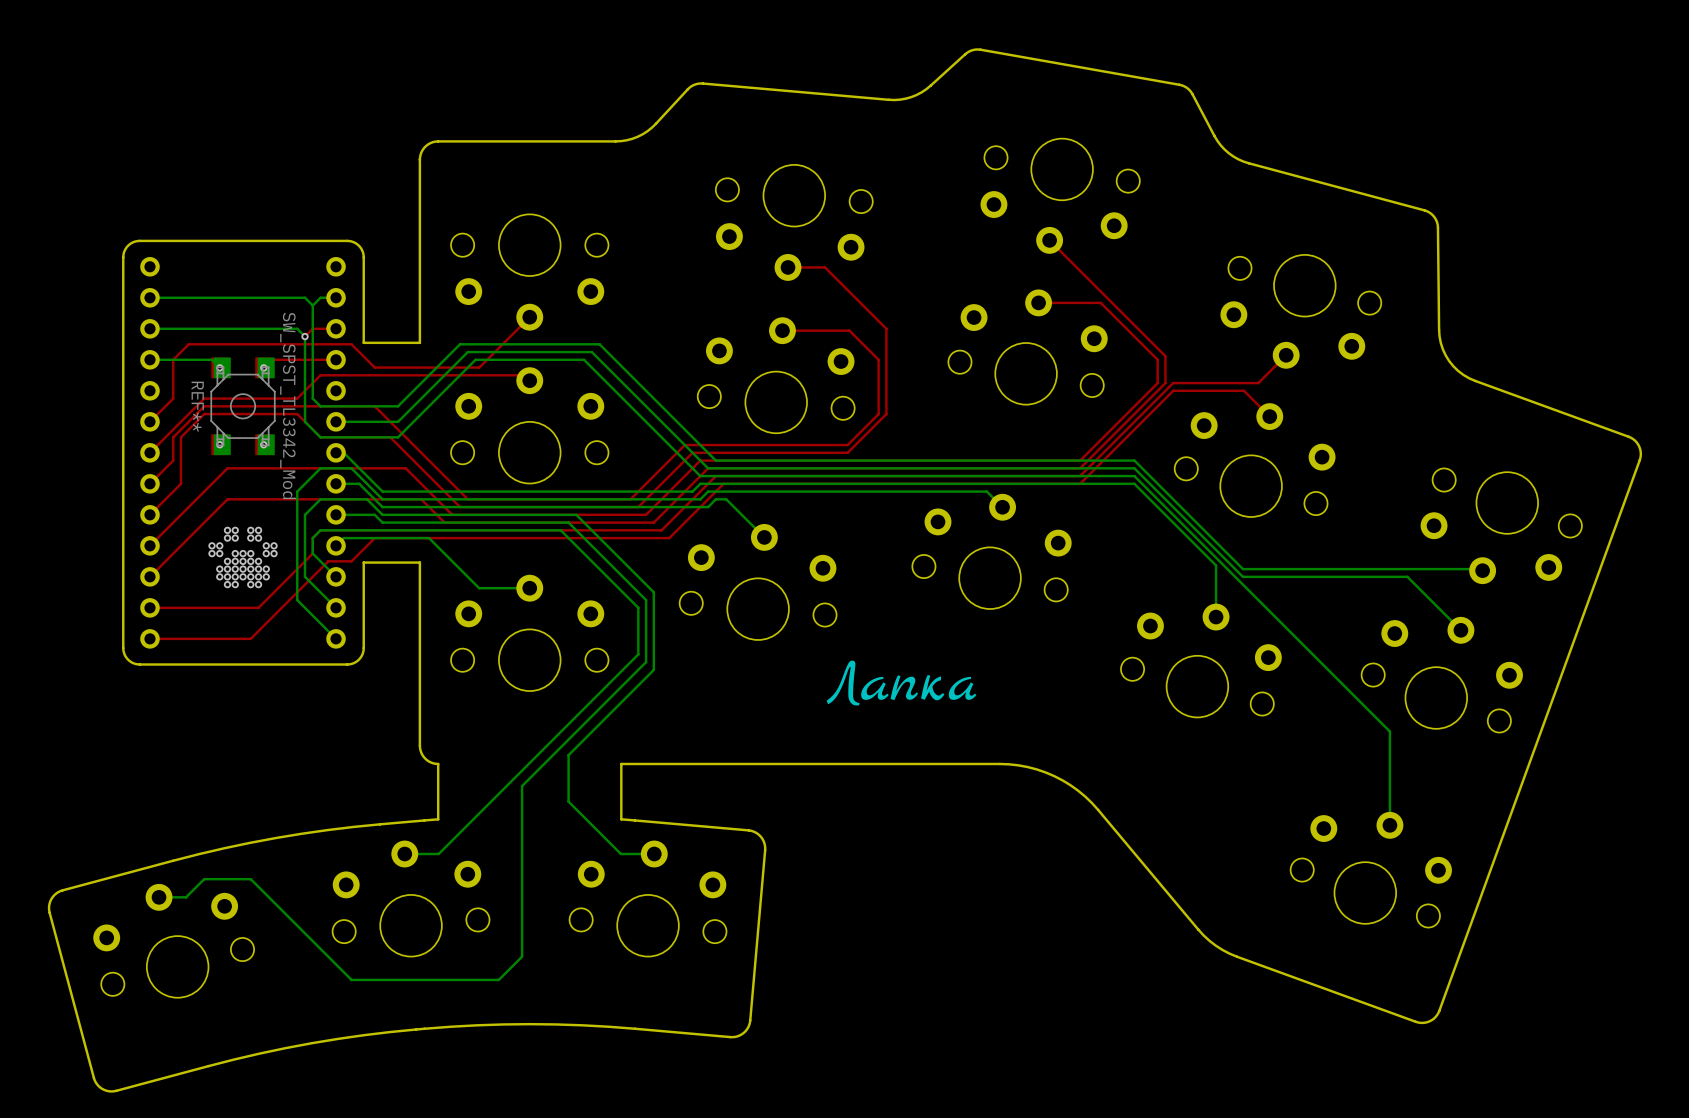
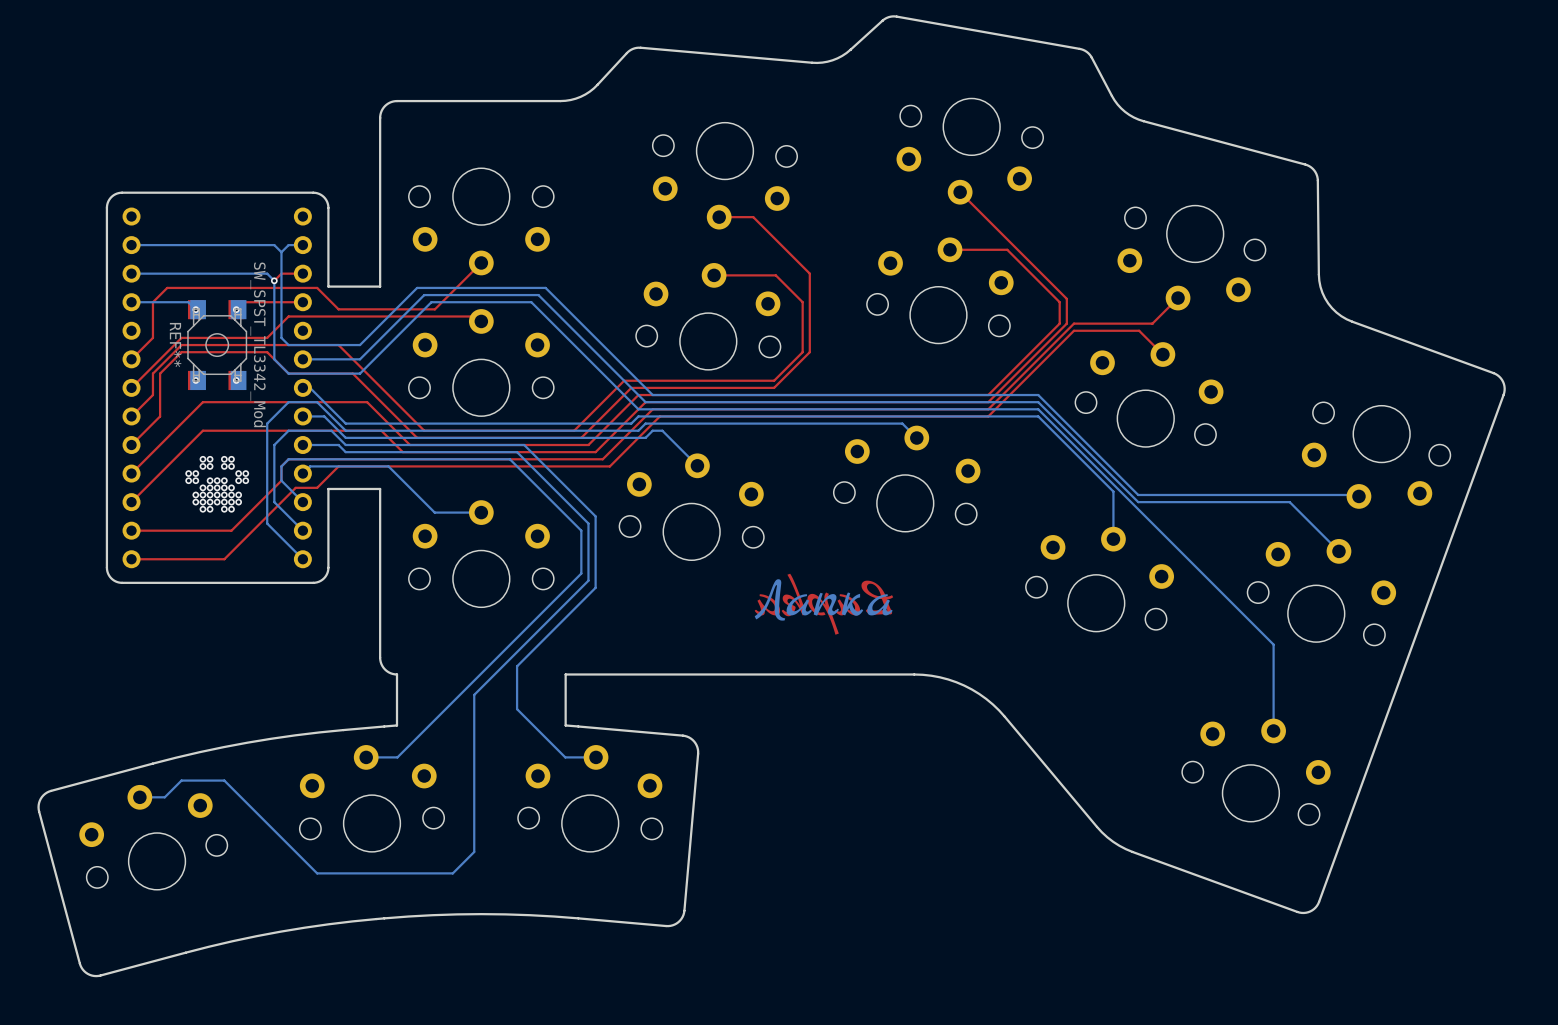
drawing: none -> [754, 573, 894, 635]
drawing shape: [826, 660, 860, 706] -> [754, 579, 786, 621]
drawing shape: [921, 674, 945, 701] -> [841, 592, 864, 616]
drawing shape: [890, 675, 919, 701] -> [813, 592, 839, 616]
drawing shape: [861, 676, 889, 700] -> [786, 594, 812, 616]
drawing shape: [948, 676, 977, 700] -> [867, 594, 893, 616]

